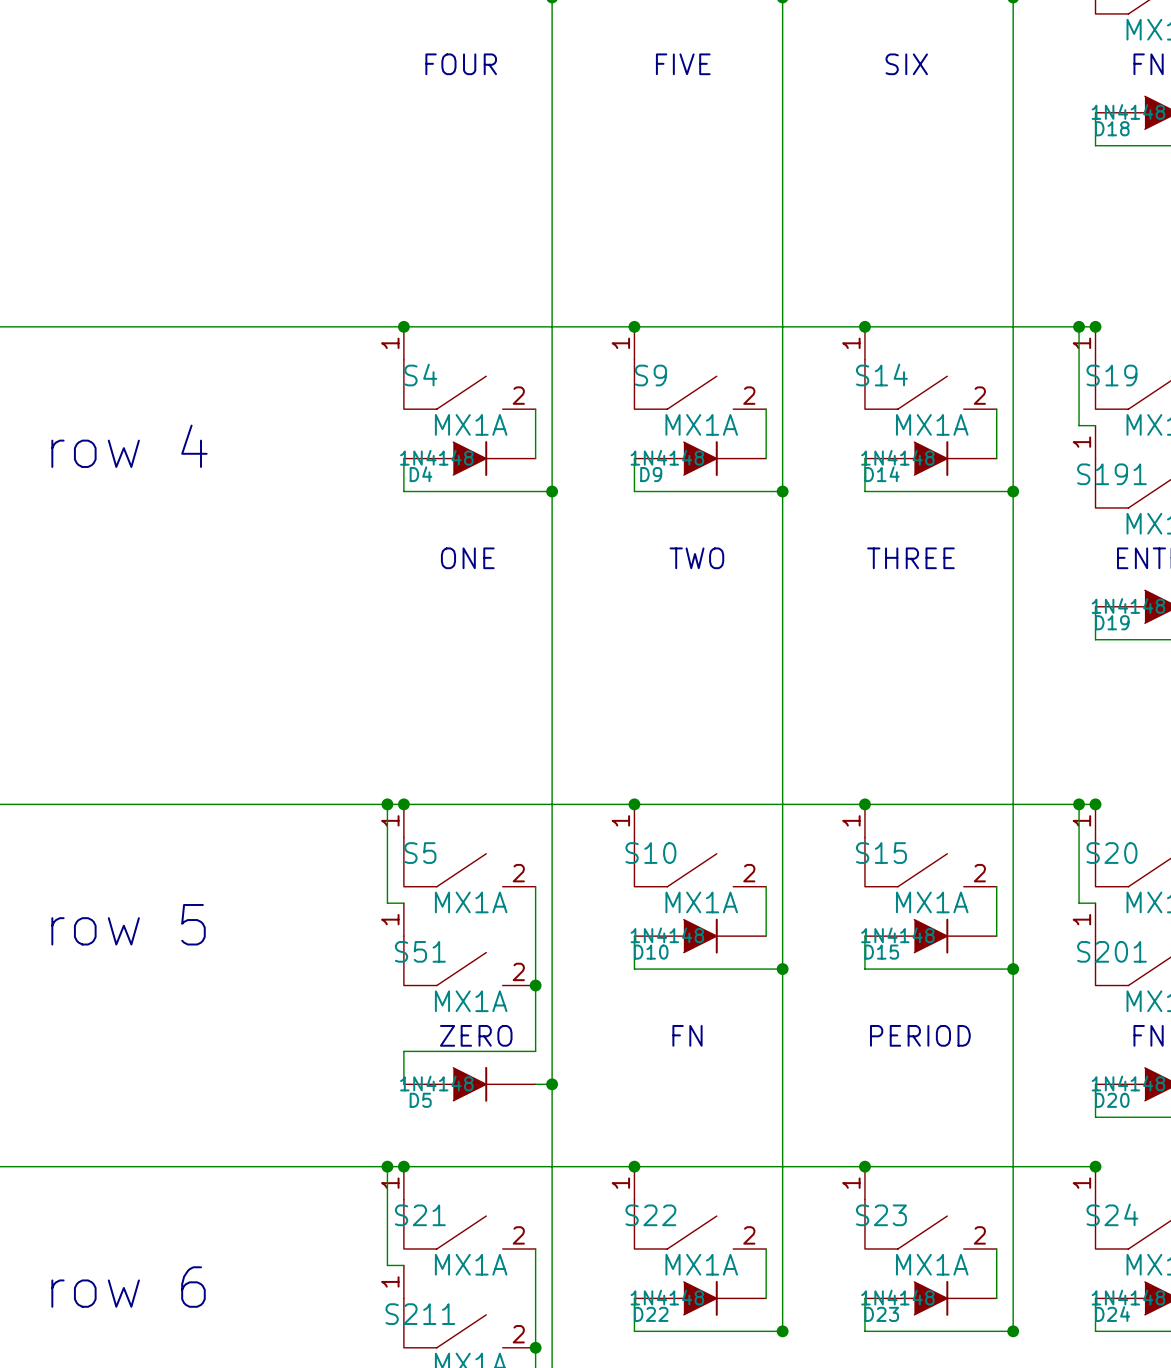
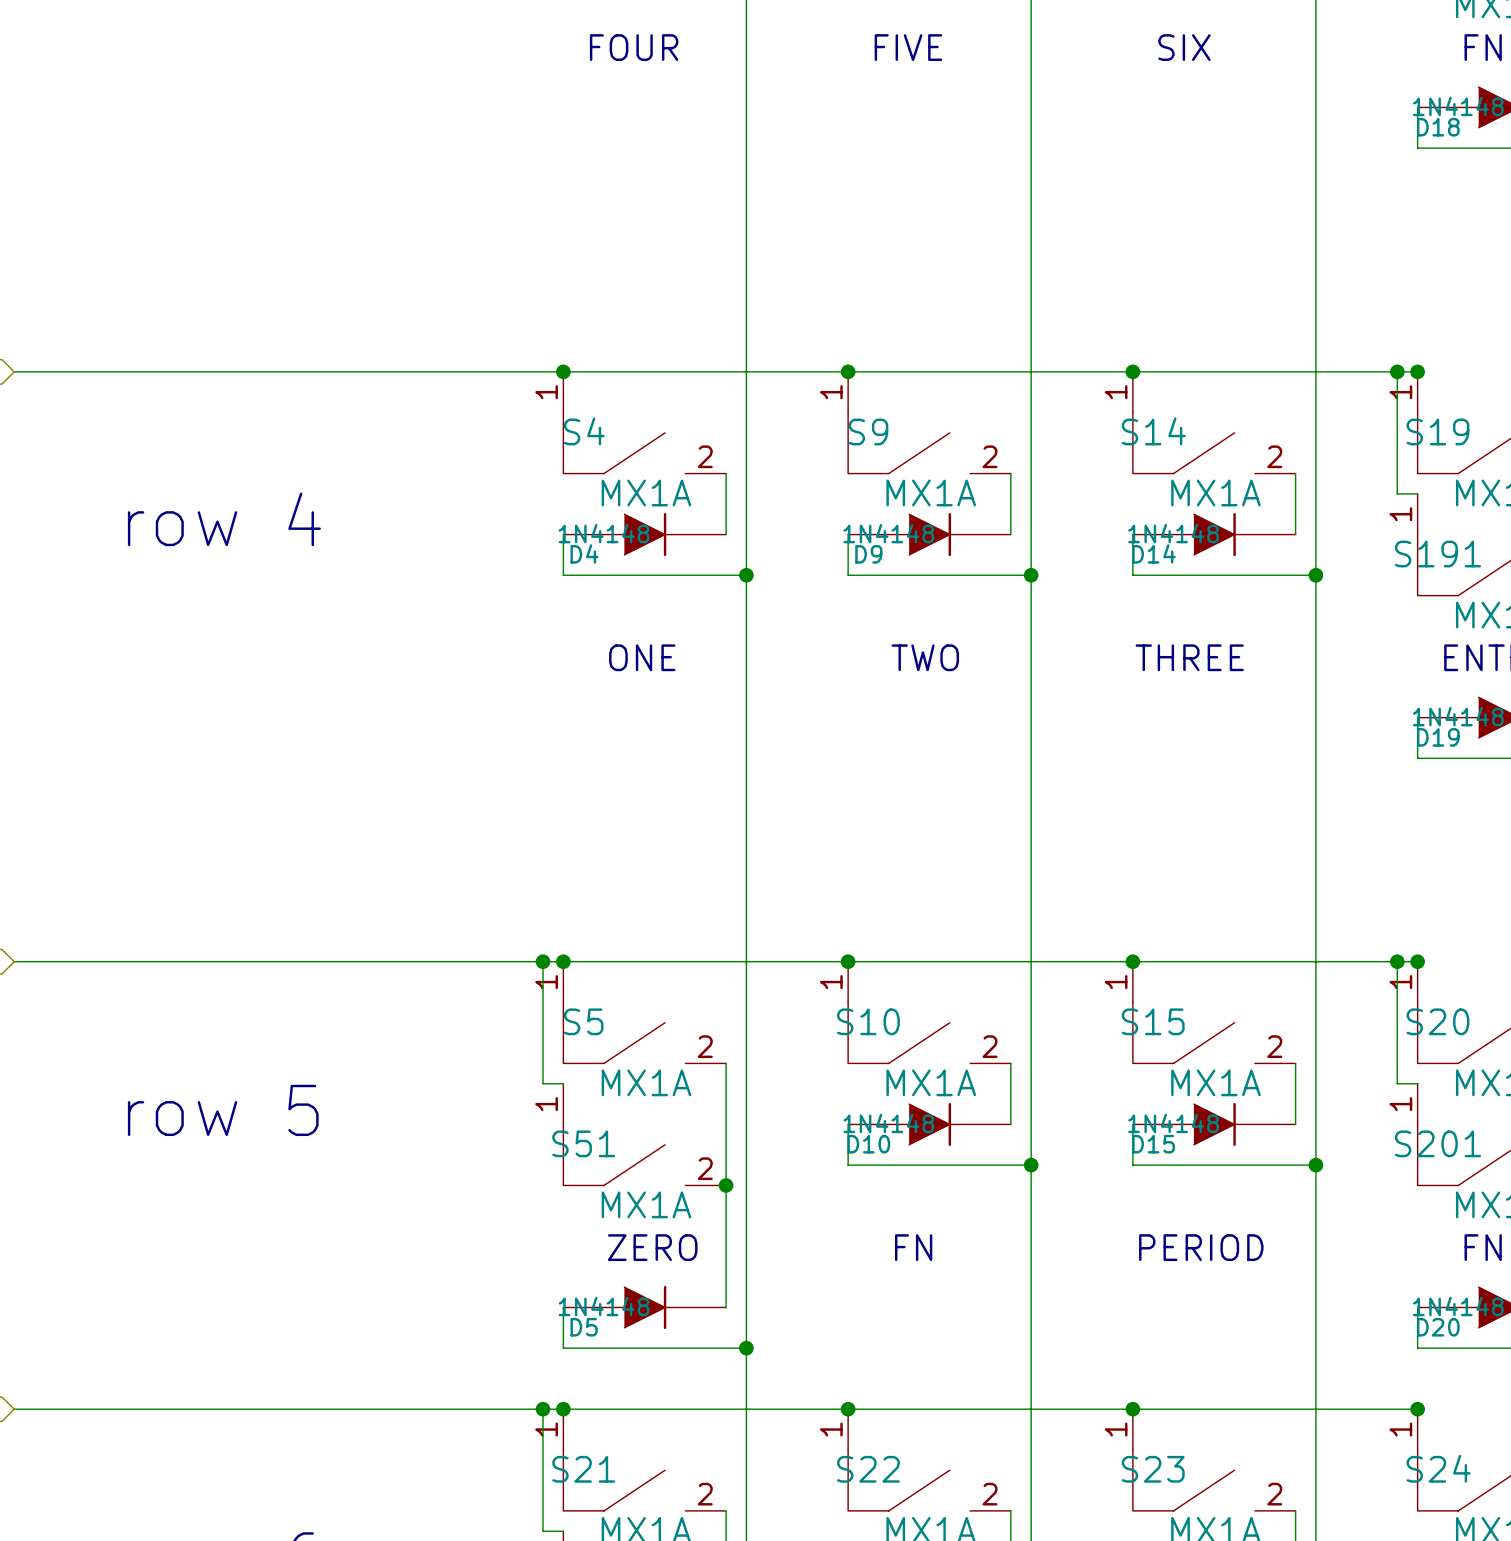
wire: (535, 1051) (403, 1051) (403, 1084) -> (746, 1348) (563, 1348) (563, 1307)
wire: (535, 1084) (552, 1084) -> (726, 1307) (726, 1266)
junction position: (552, 1084) -> (746, 1348)

